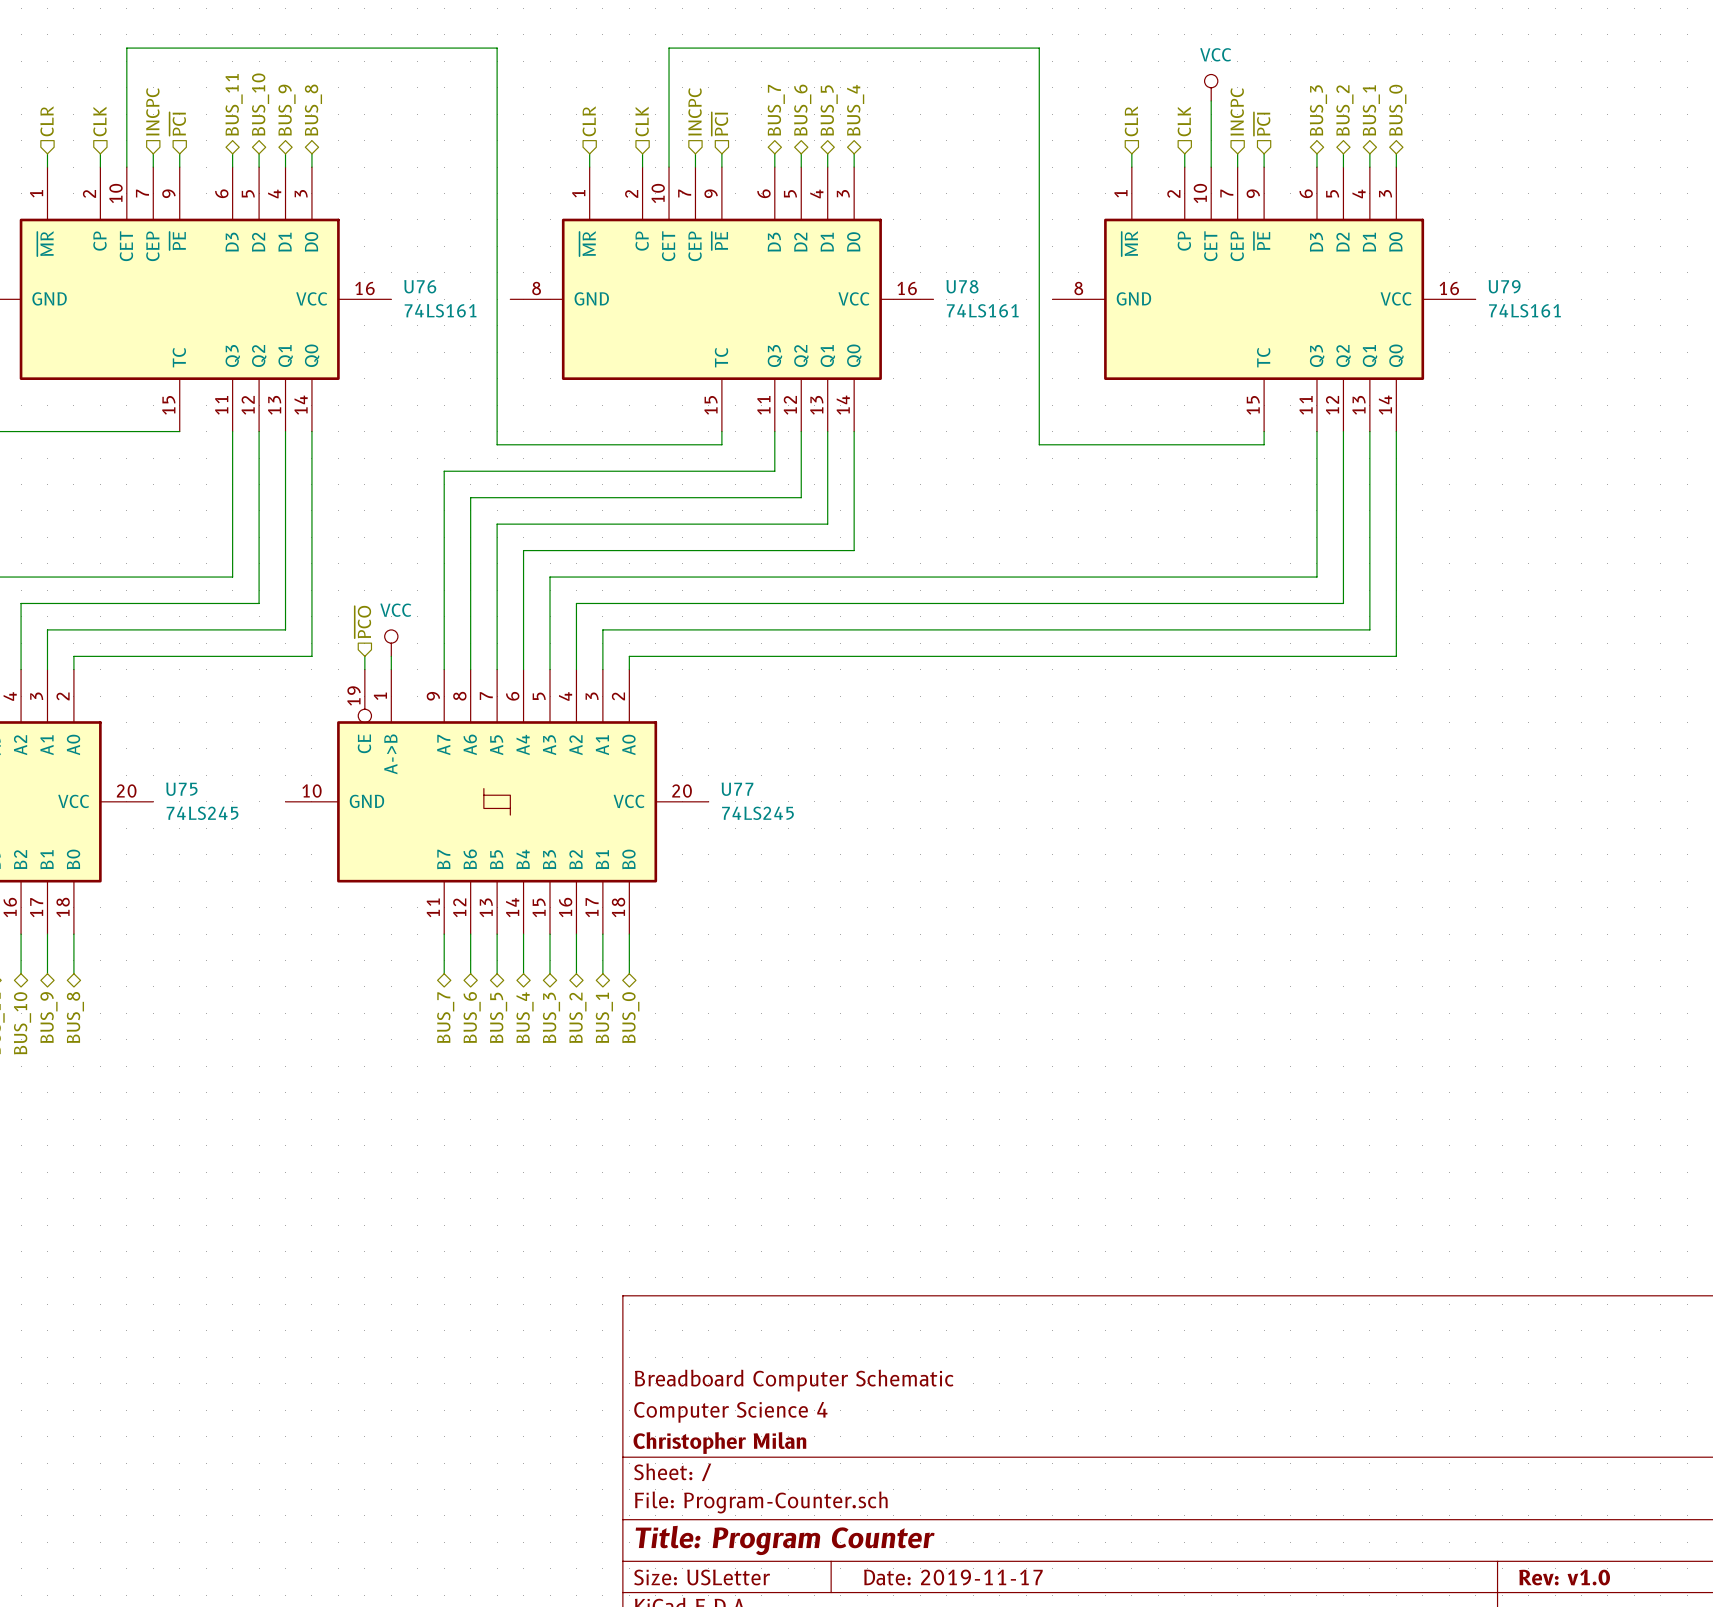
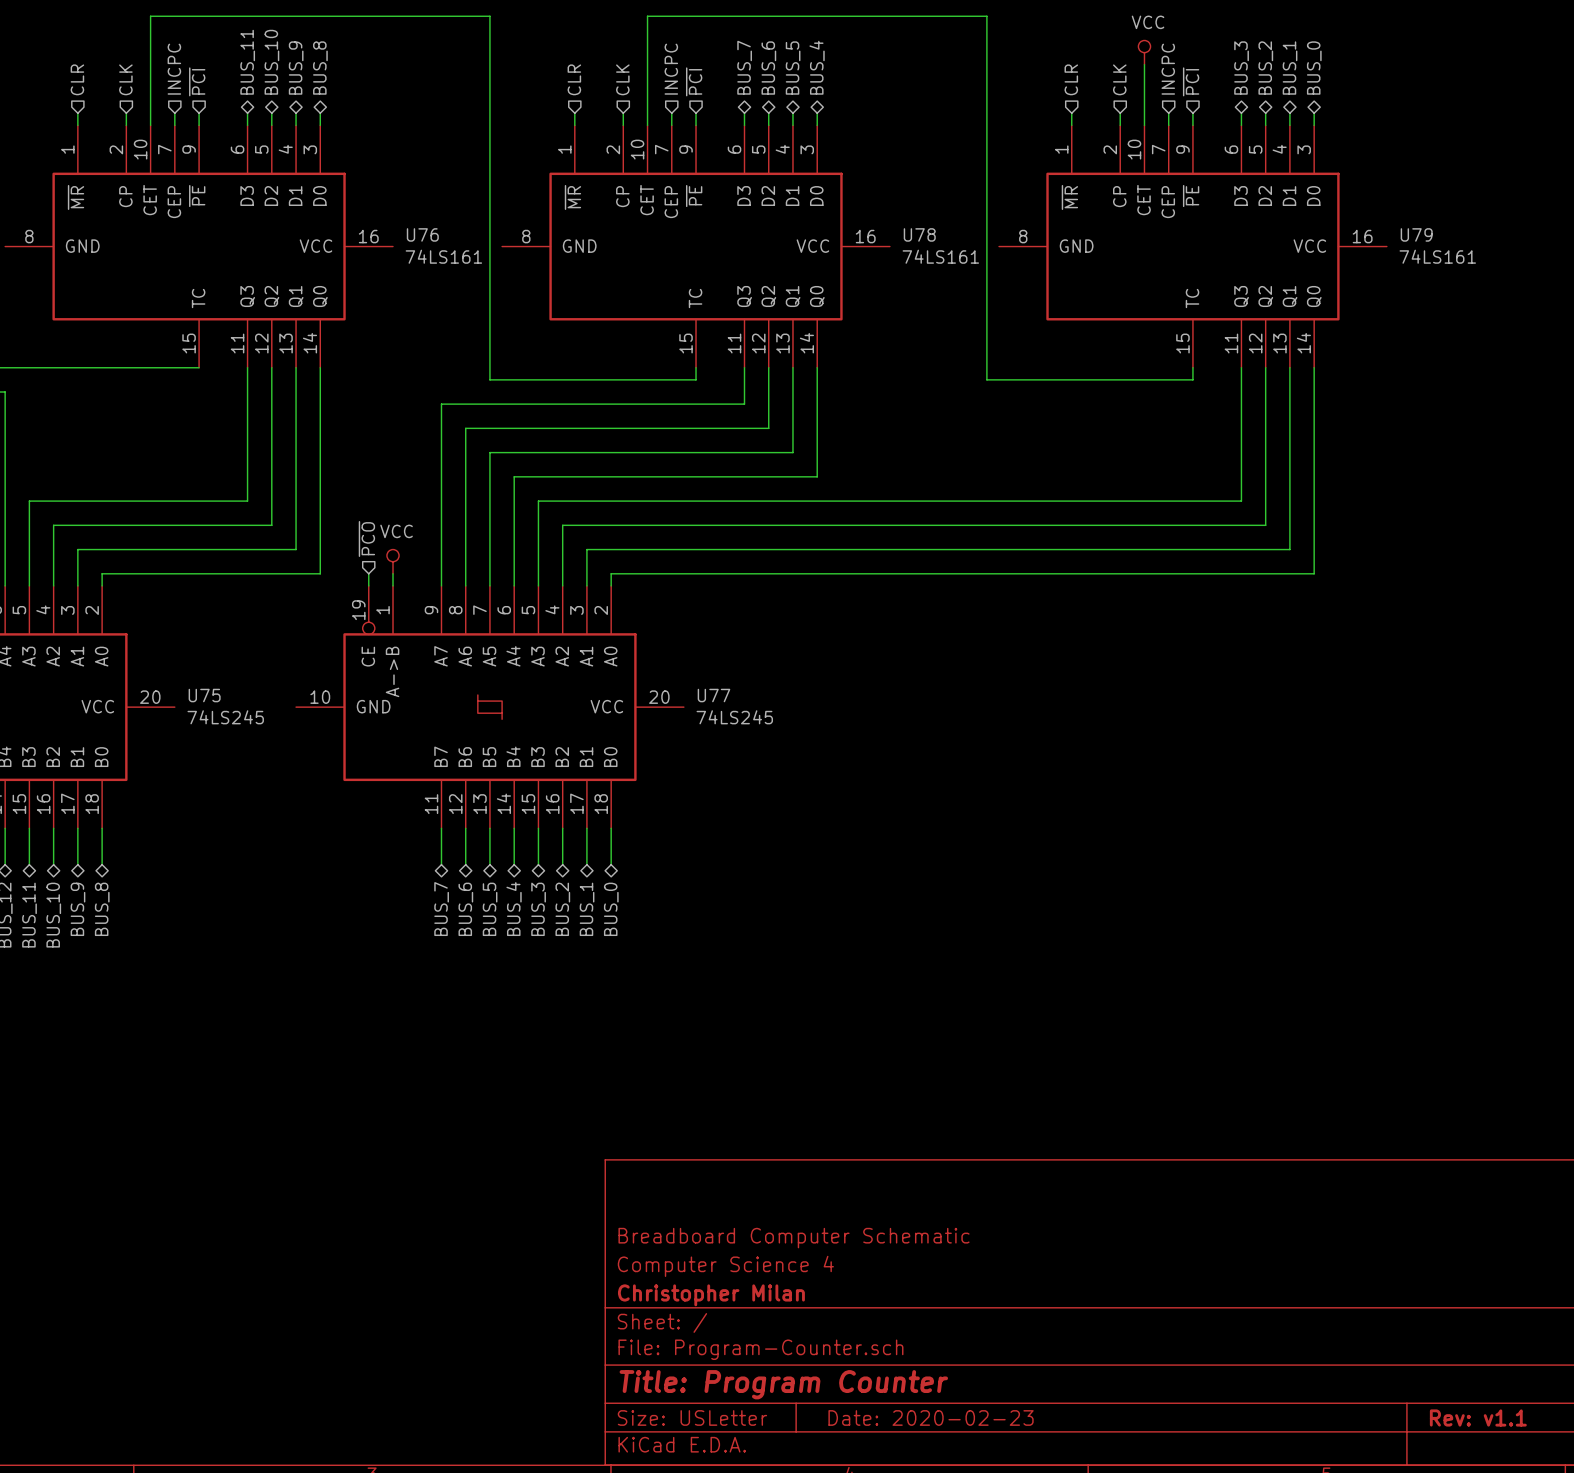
title block: Date: 2019-11-17 (953, 1577) -> Date: 2020-02-23 (931, 1417)
title block: Rev: v1.0 (1564, 1577) -> Rev: v1.1 (1478, 1417)

